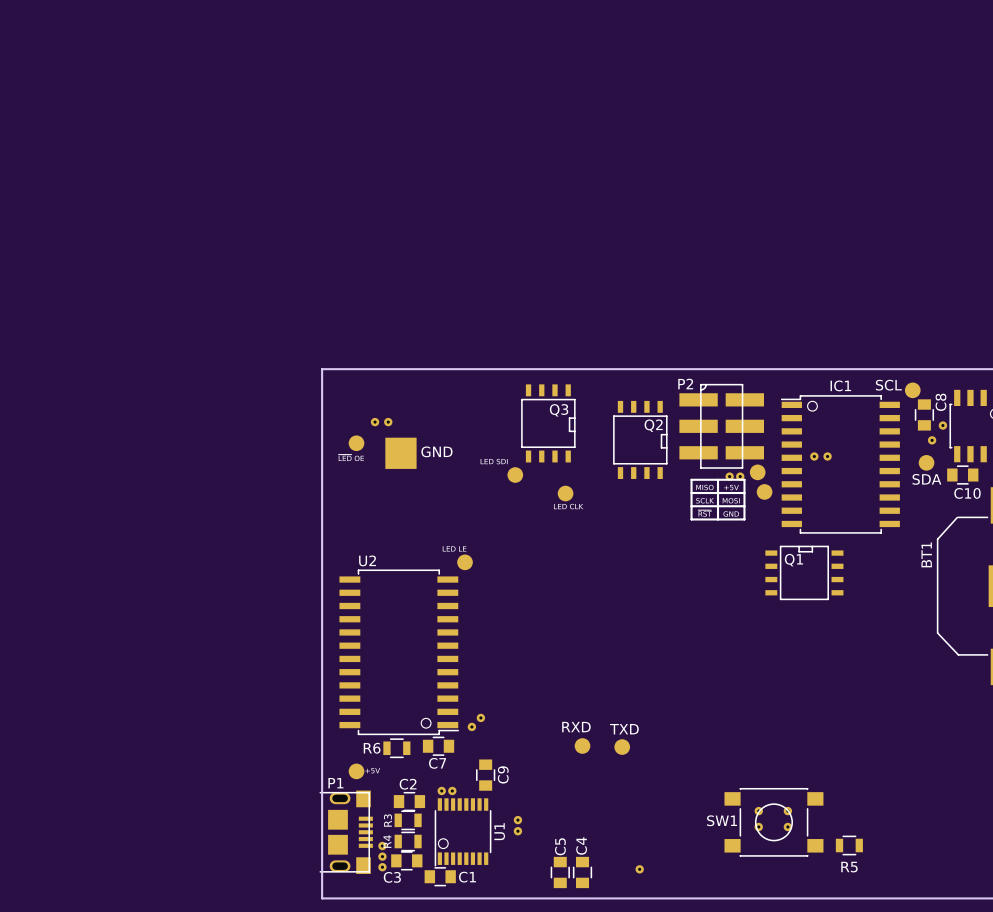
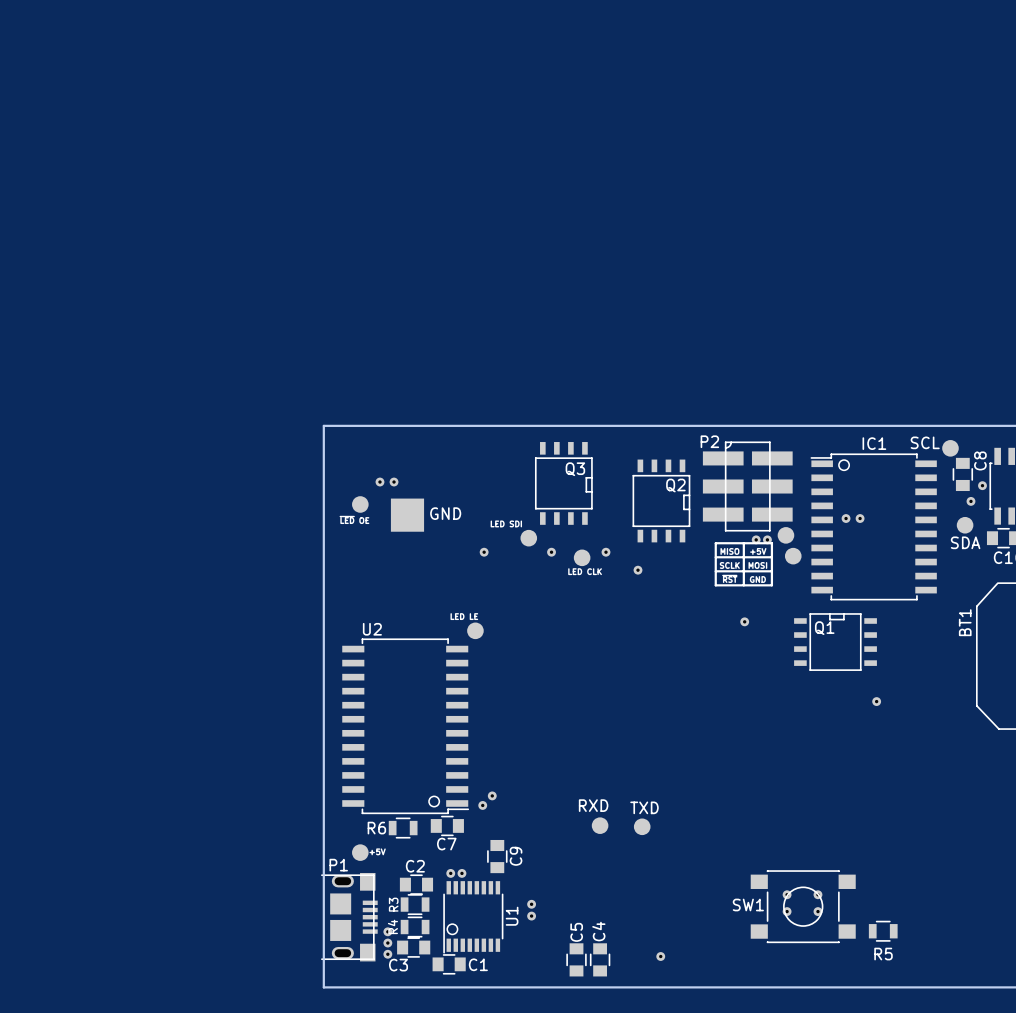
part: none -> (484, 552)
part: none -> (551, 552)
part: none -> (605, 552)
part: none -> (638, 570)
part: none -> (744, 621)
part: none -> (876, 701)

